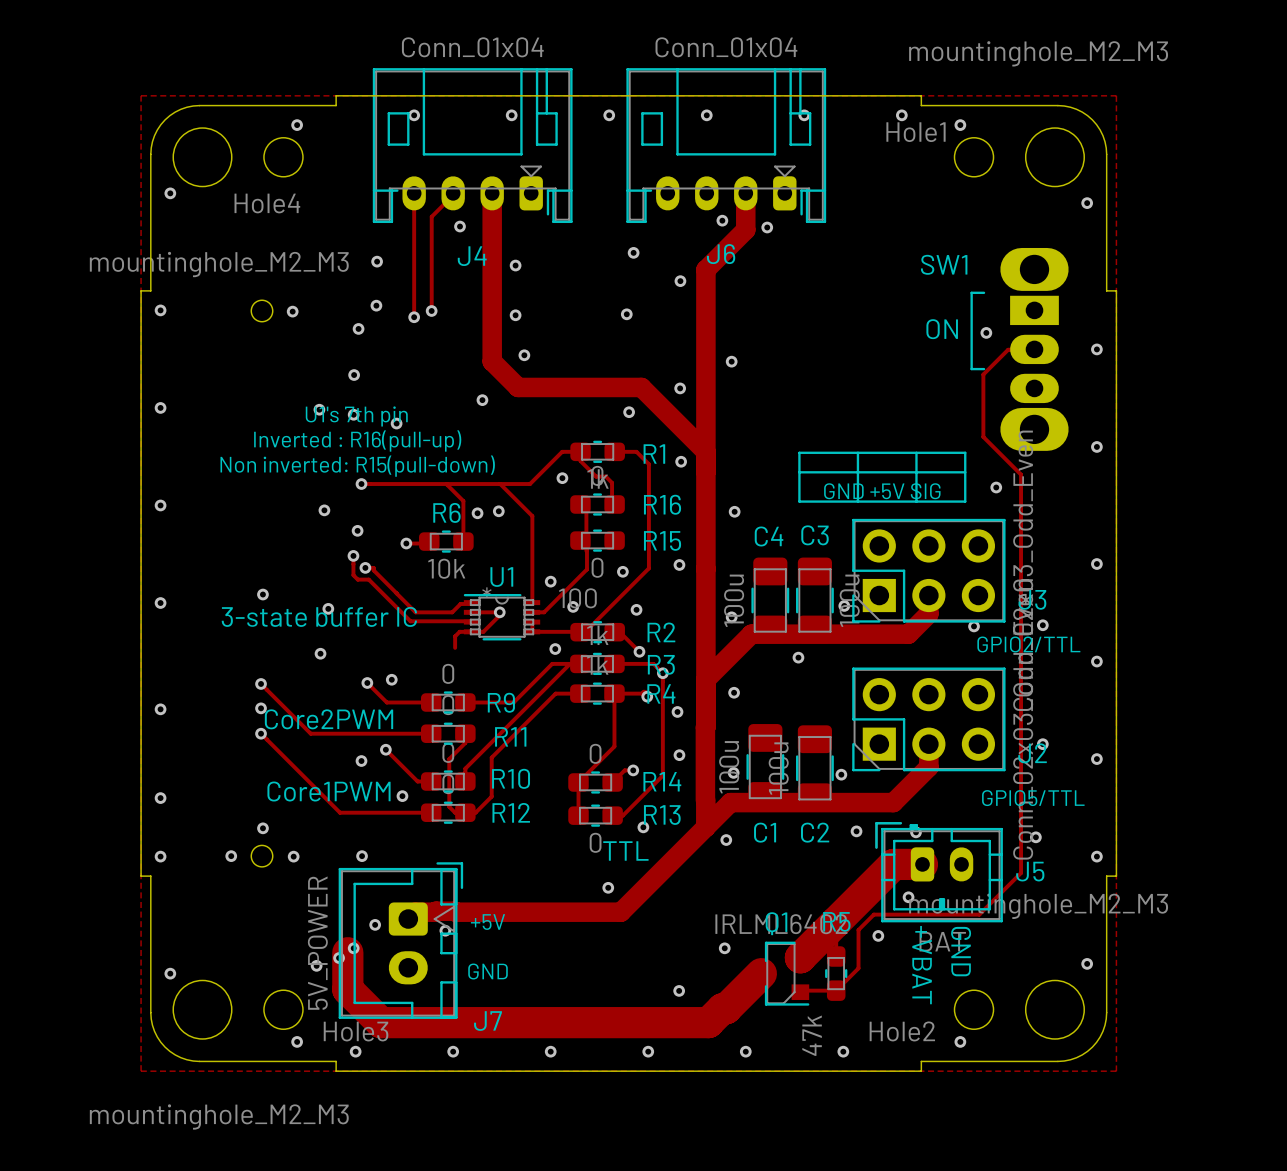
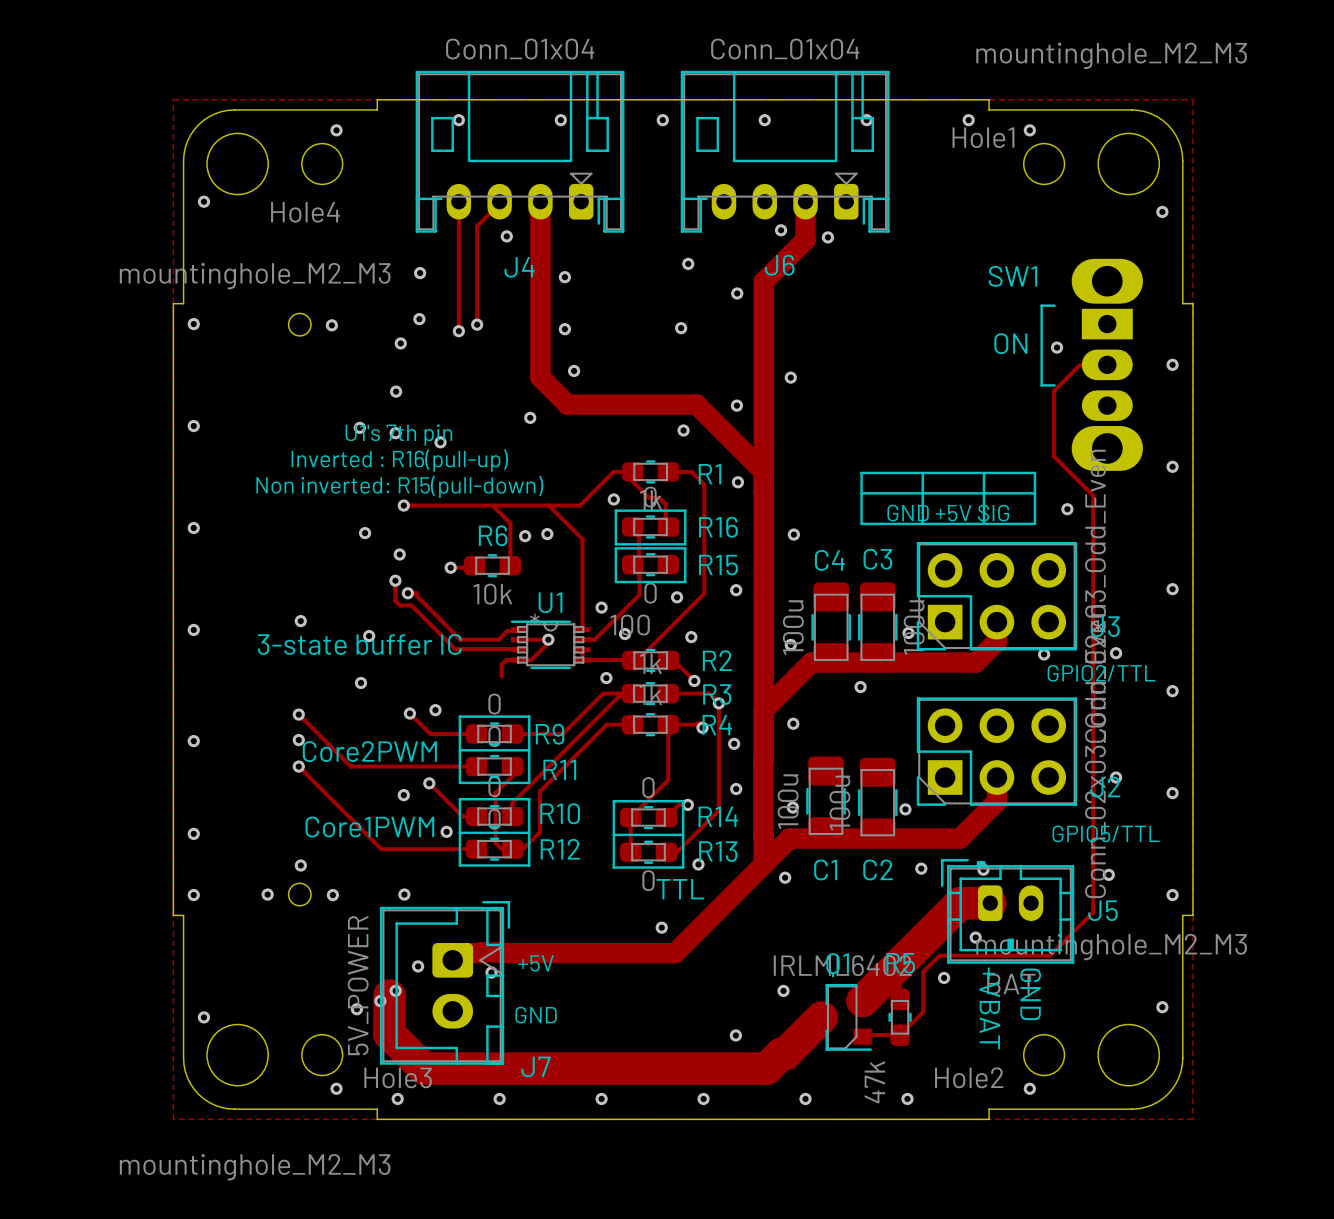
line: none -> (615, 510) (615, 544) (685, 544) (685, 510) (615, 510)
line: none -> (615, 548) (615, 582) (685, 582) (685, 548) (615, 548)
line: none -> (459, 716) (529, 716) (529, 782) (459, 782) (459, 716)
line: none -> (459, 750) (529, 750)
line: none -> (459, 799) (459, 865) (529, 865) (529, 799) (459, 799)
line: none -> (613, 801) (613, 867) (683, 867) (683, 801) (613, 801)
line: none -> (459, 832) (529, 832)
line: none -> (613, 834) (683, 834)

